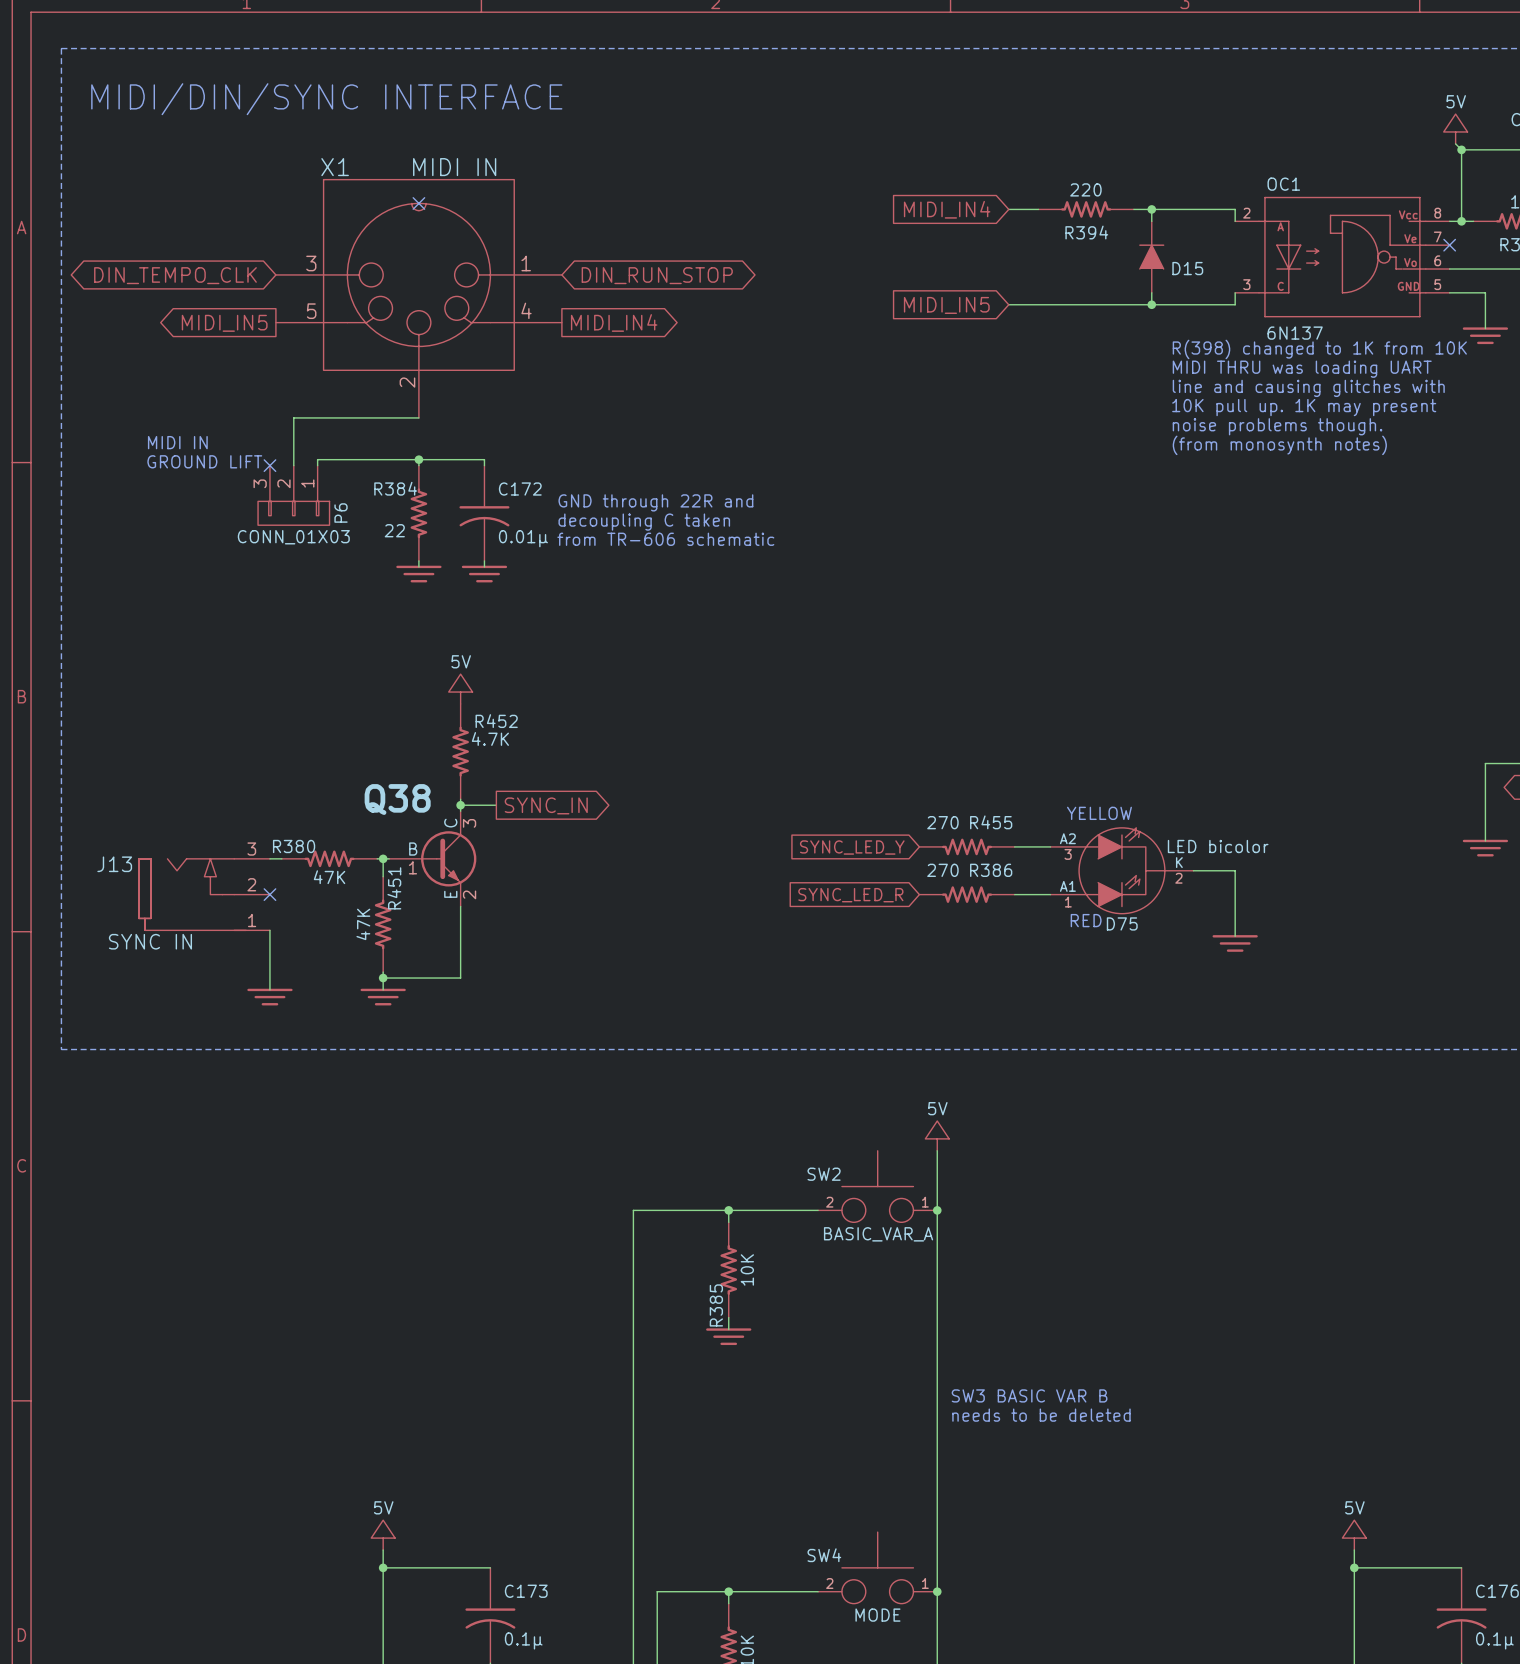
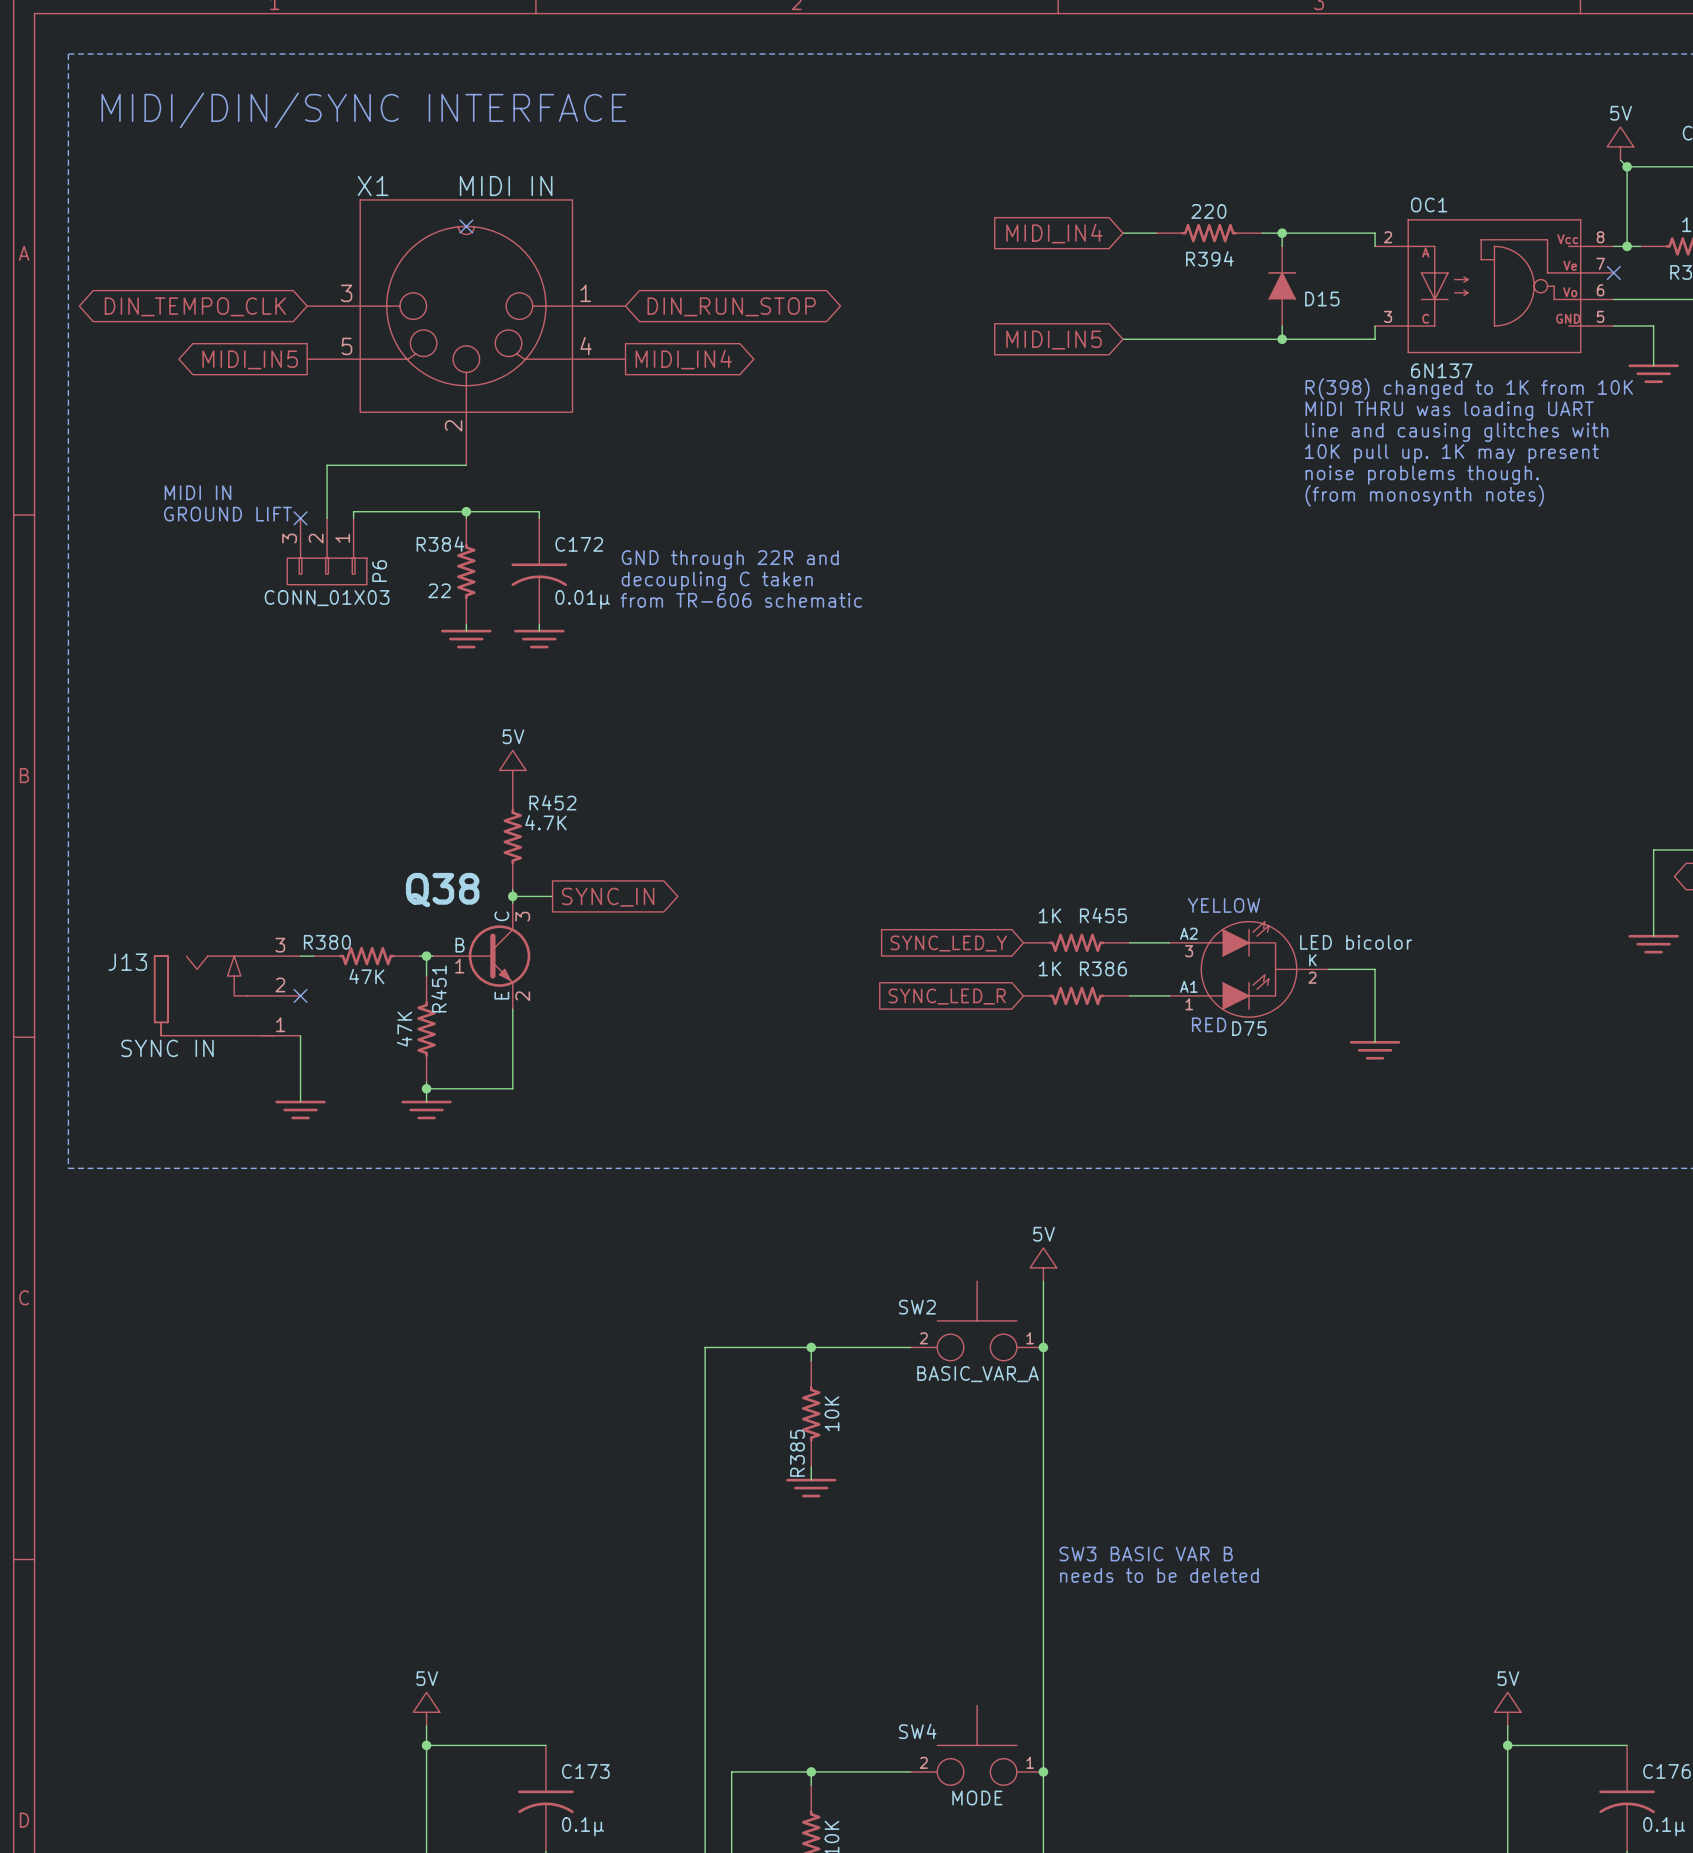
R455 value: 270 (942, 822) -> 1K (1050, 915)
R386 value: 270 (942, 870) -> 1K (1050, 968)

